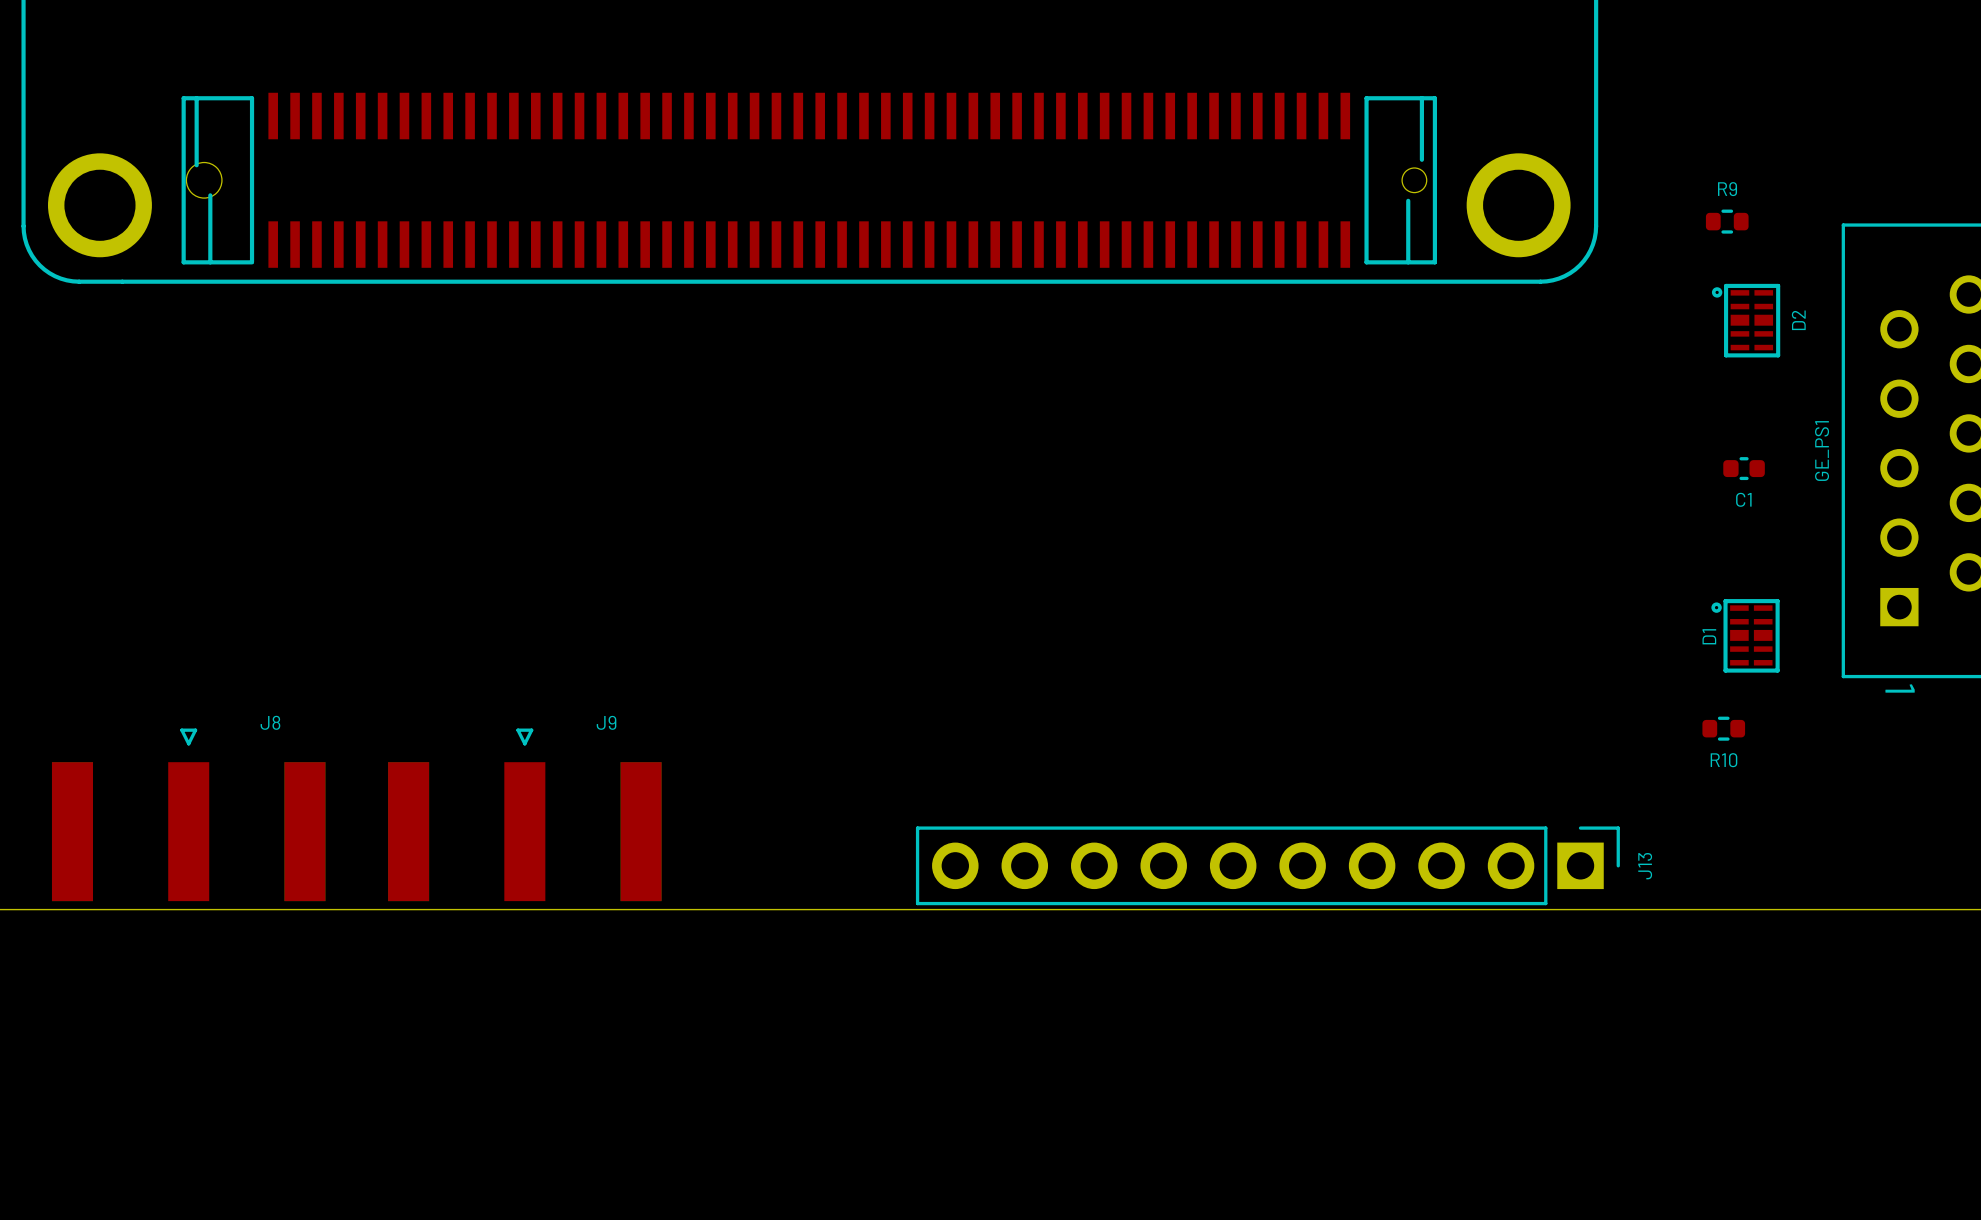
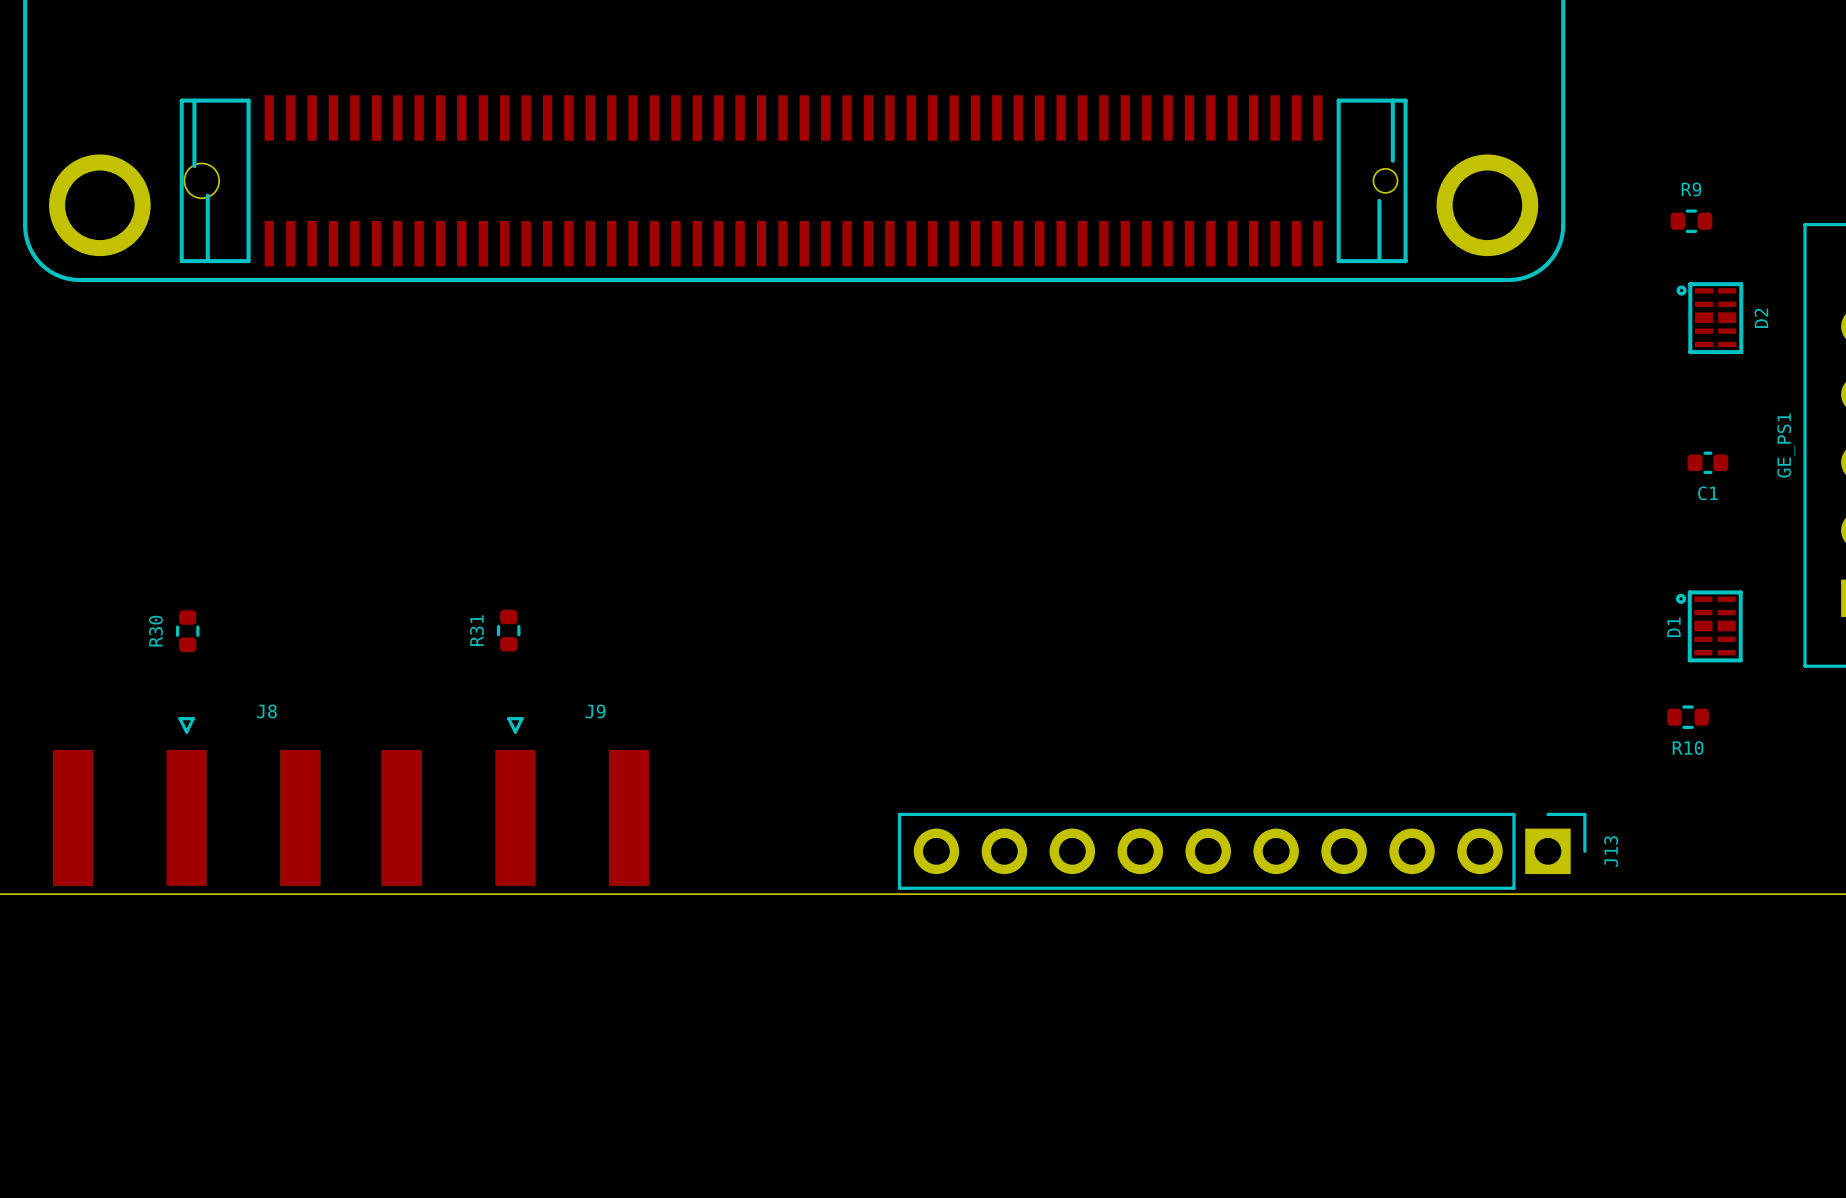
R30: none -> (187, 631)
R31: none -> (508, 630)

